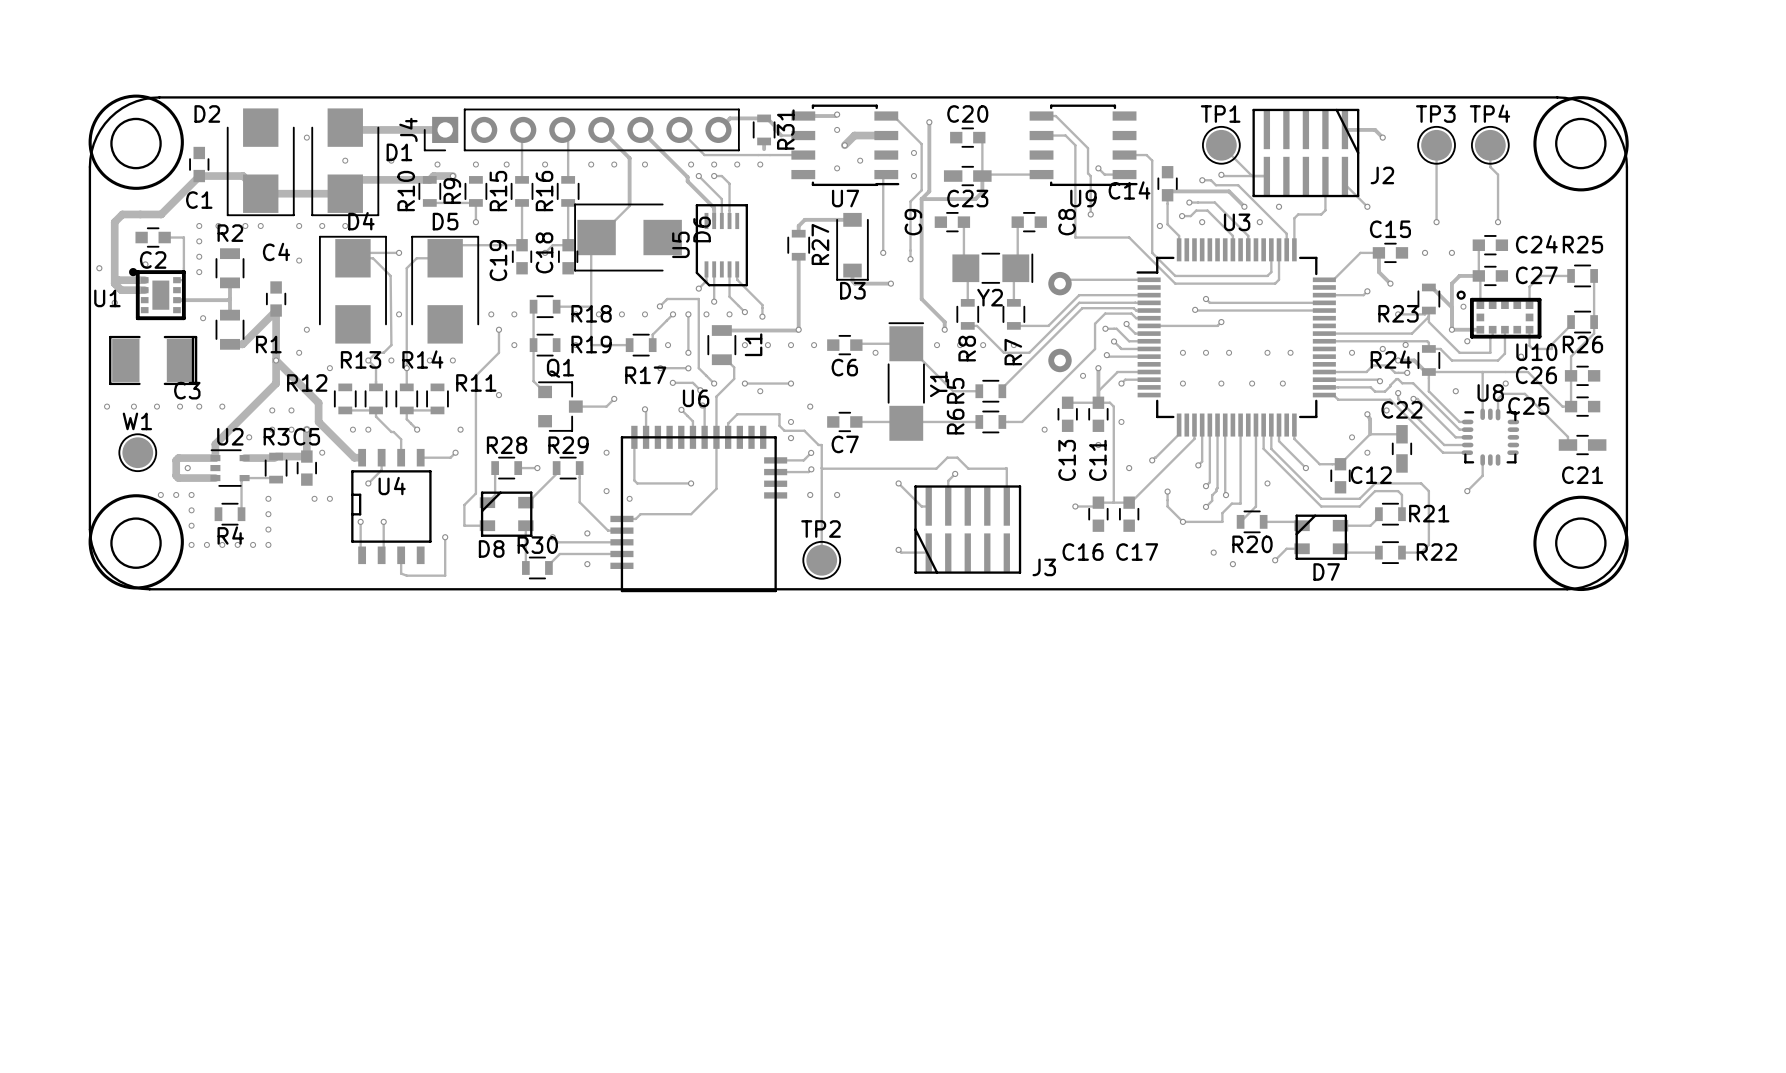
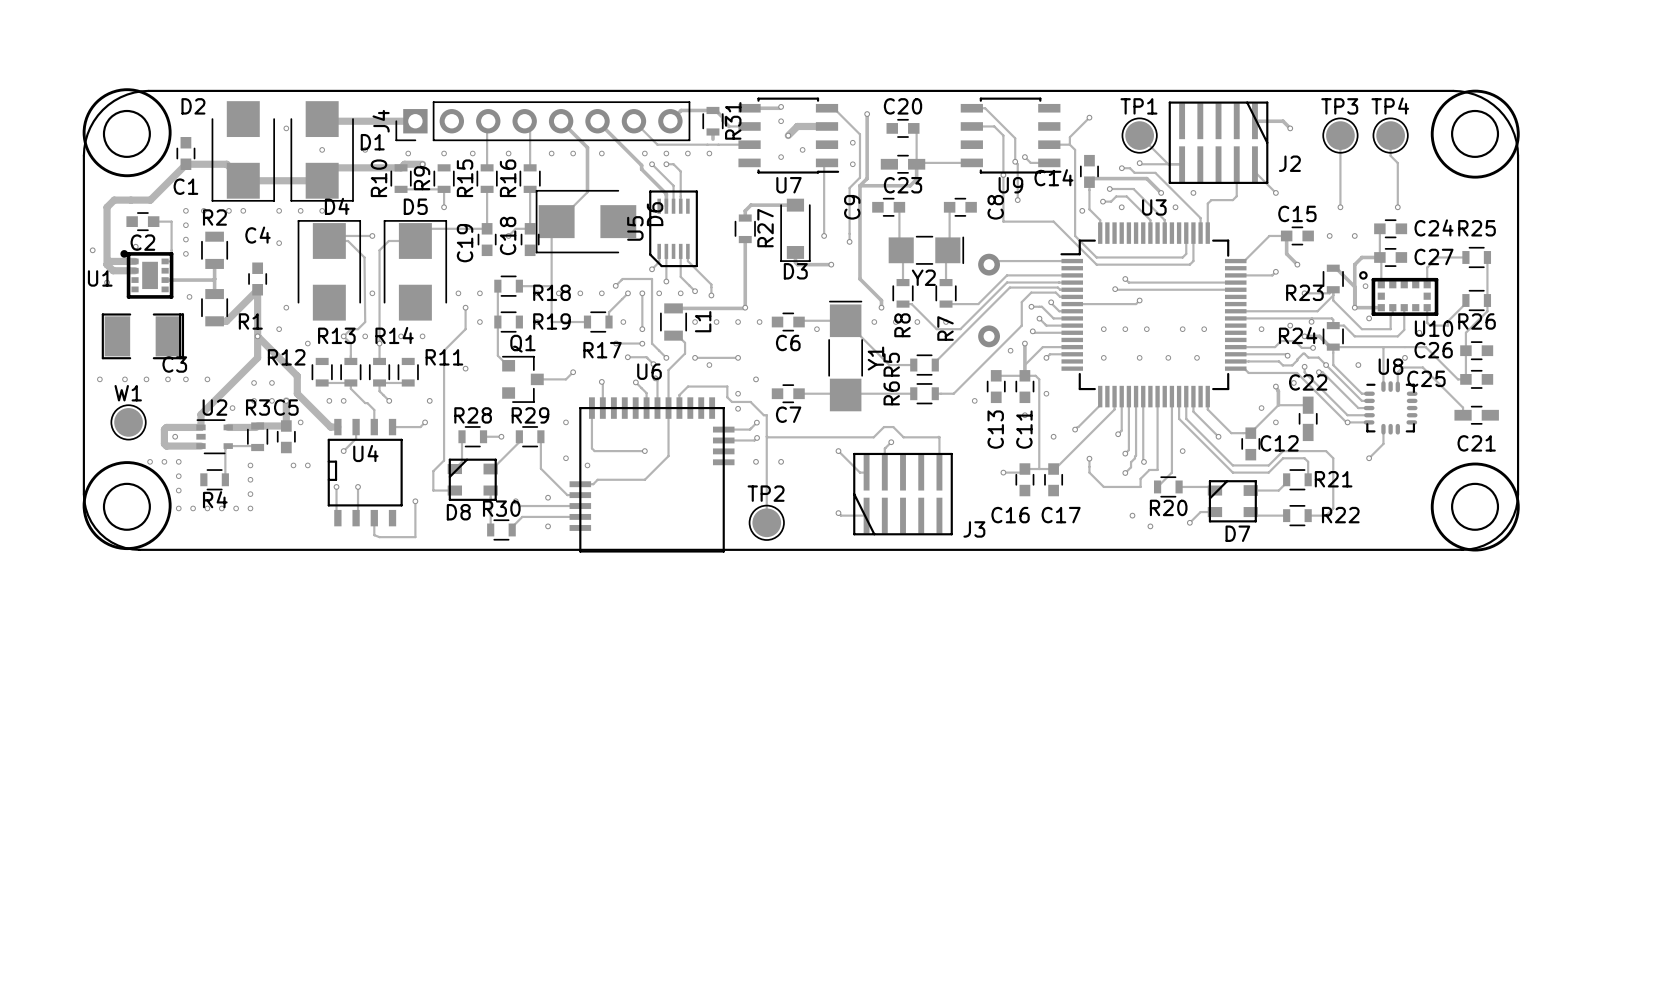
track: none -> (1089, 117) (1069, 137) (1069, 144)
via: none -> (1089, 117)
via: none -> (1015, 161)
via: none -> (1003, 175)
via: none -> (1326, 365)
via: none -> (1347, 422)
via: (1182, 521) -> none

